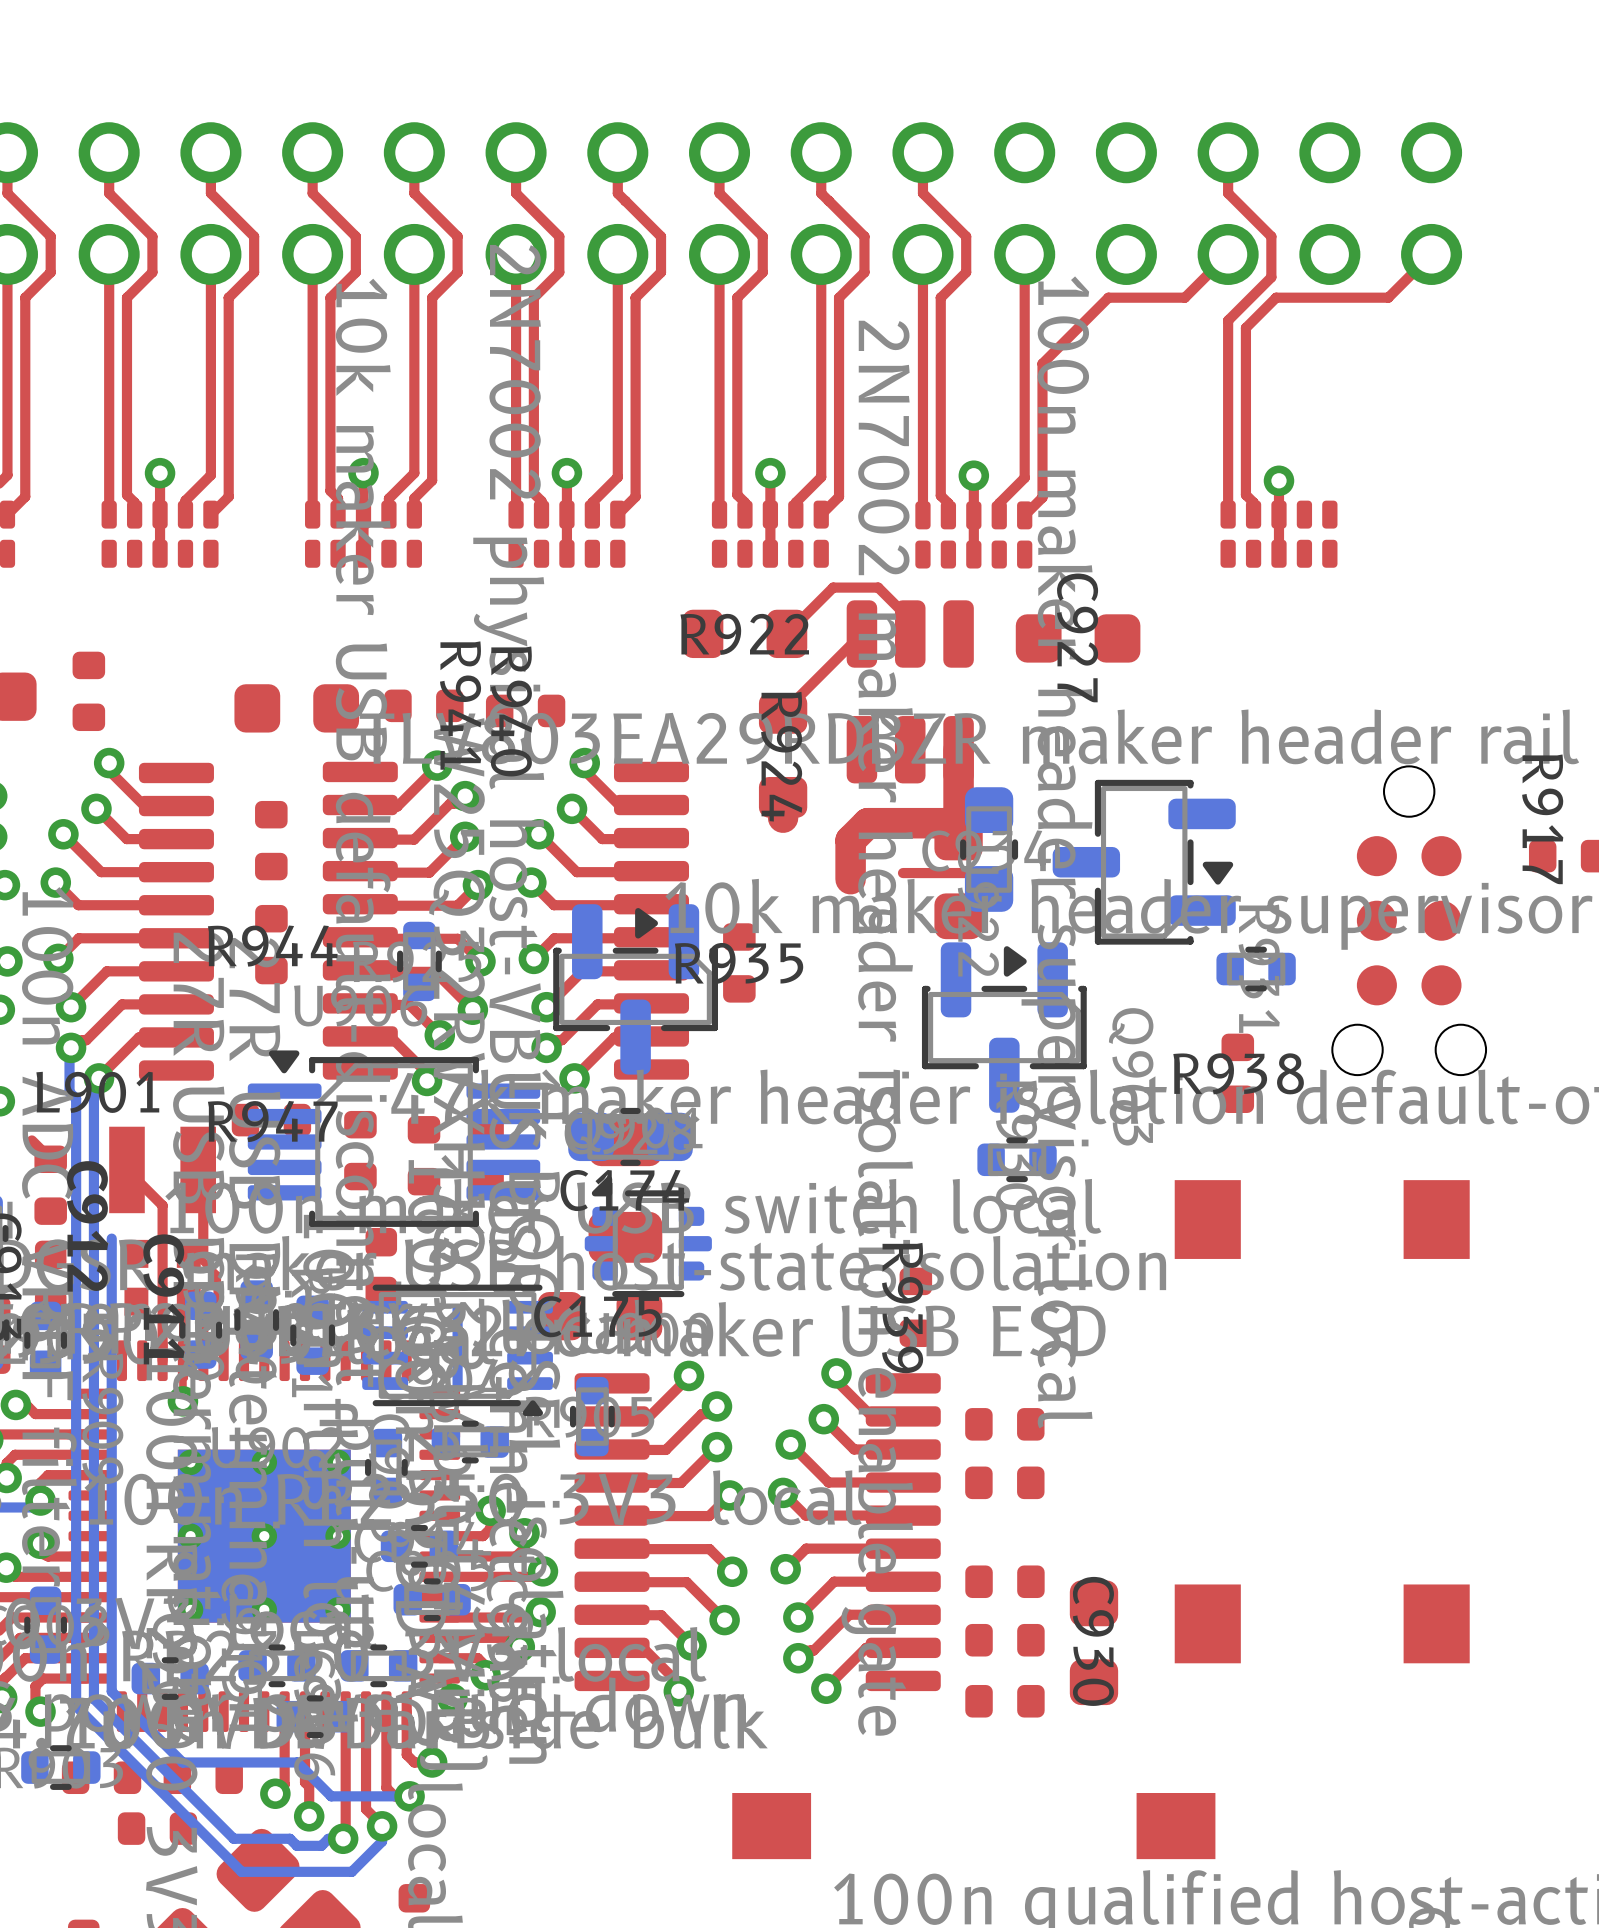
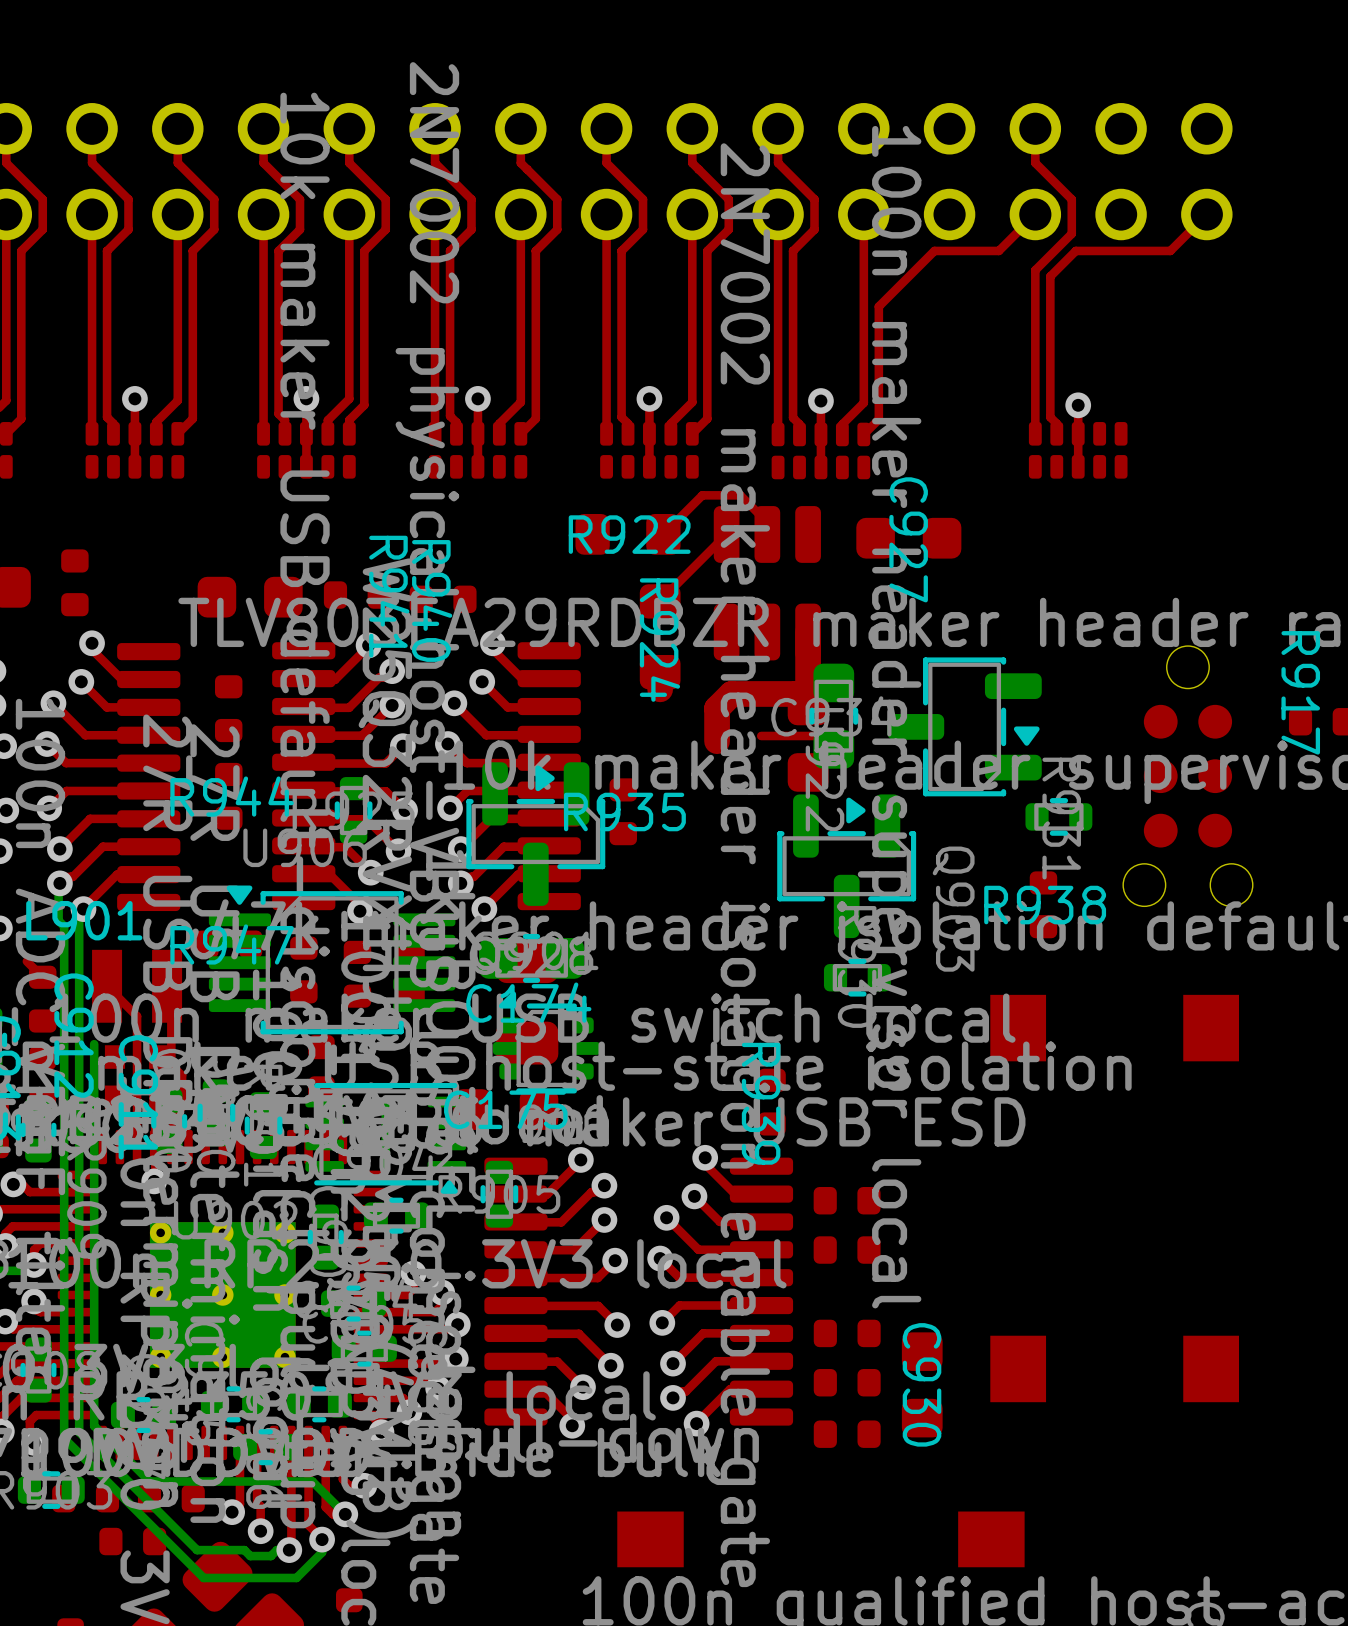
bottom track: (177, 1757) (182, 1762) (297, 1762) (331, 1796) (409, 1796) -> (149, 1481) (312, 1481) (345, 1514)

